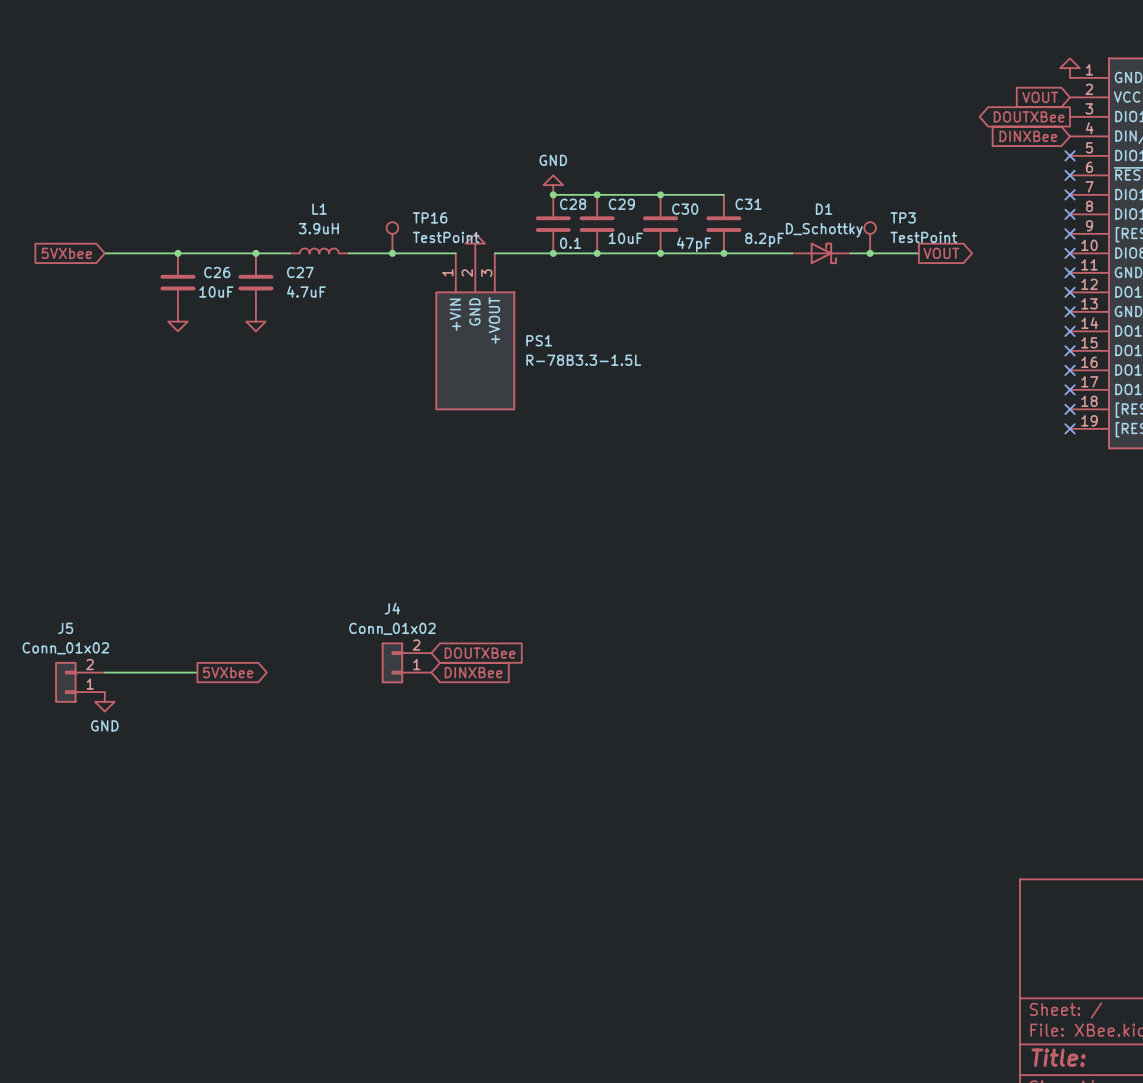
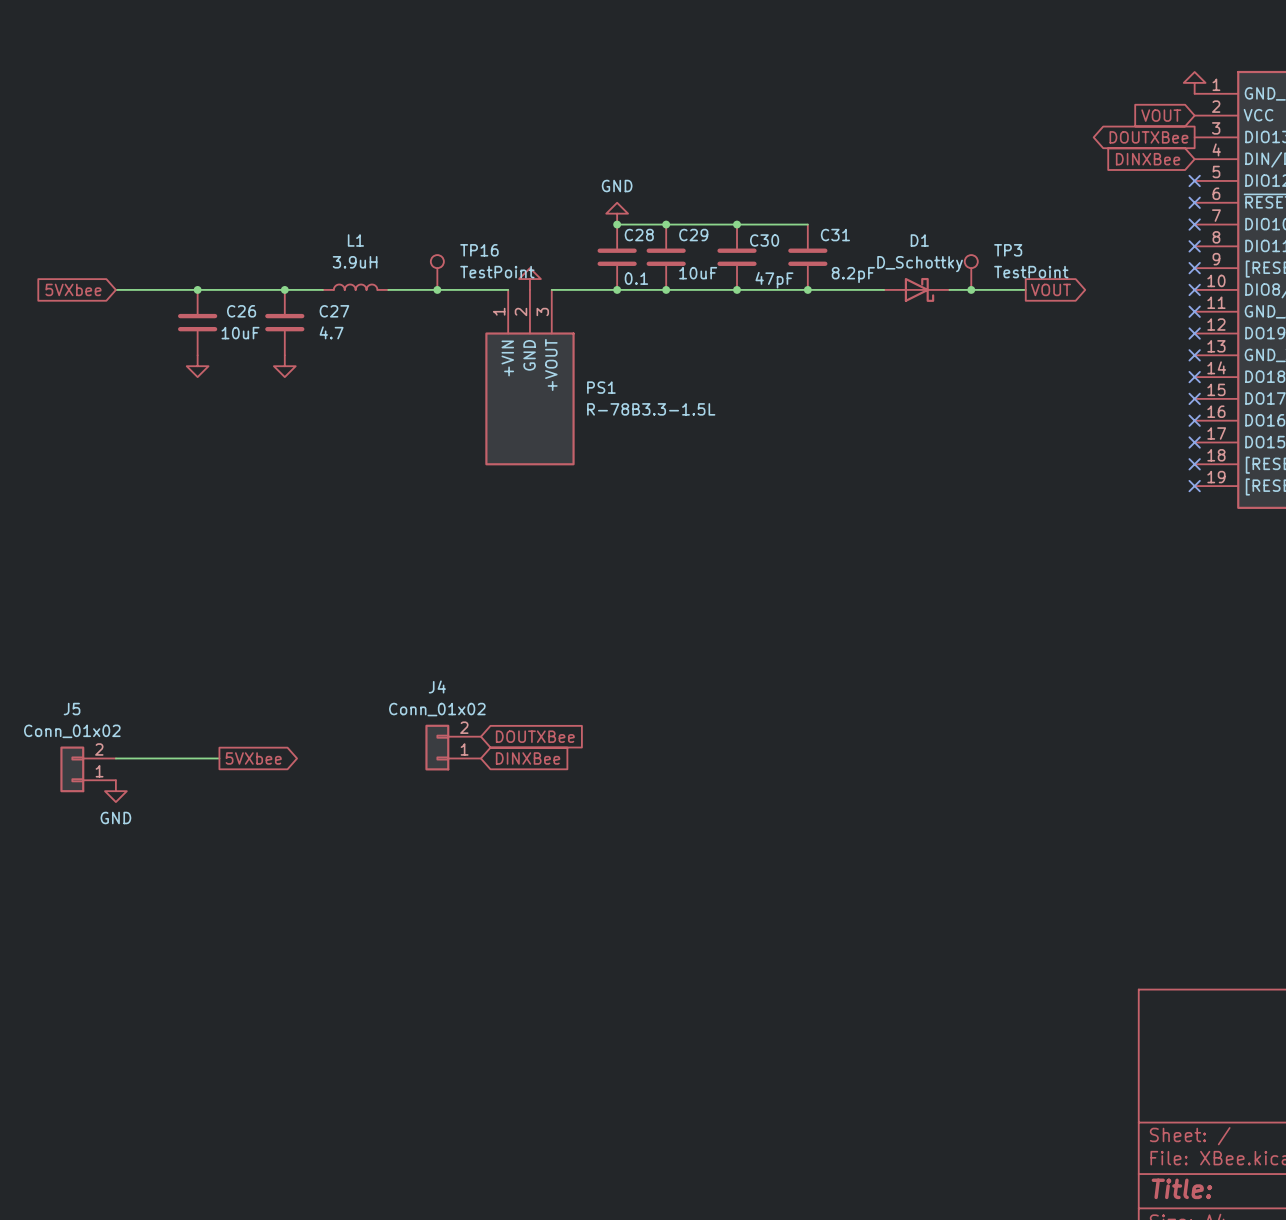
C27 value: 4.7uF (306, 291) -> 4.7 (331, 332)

